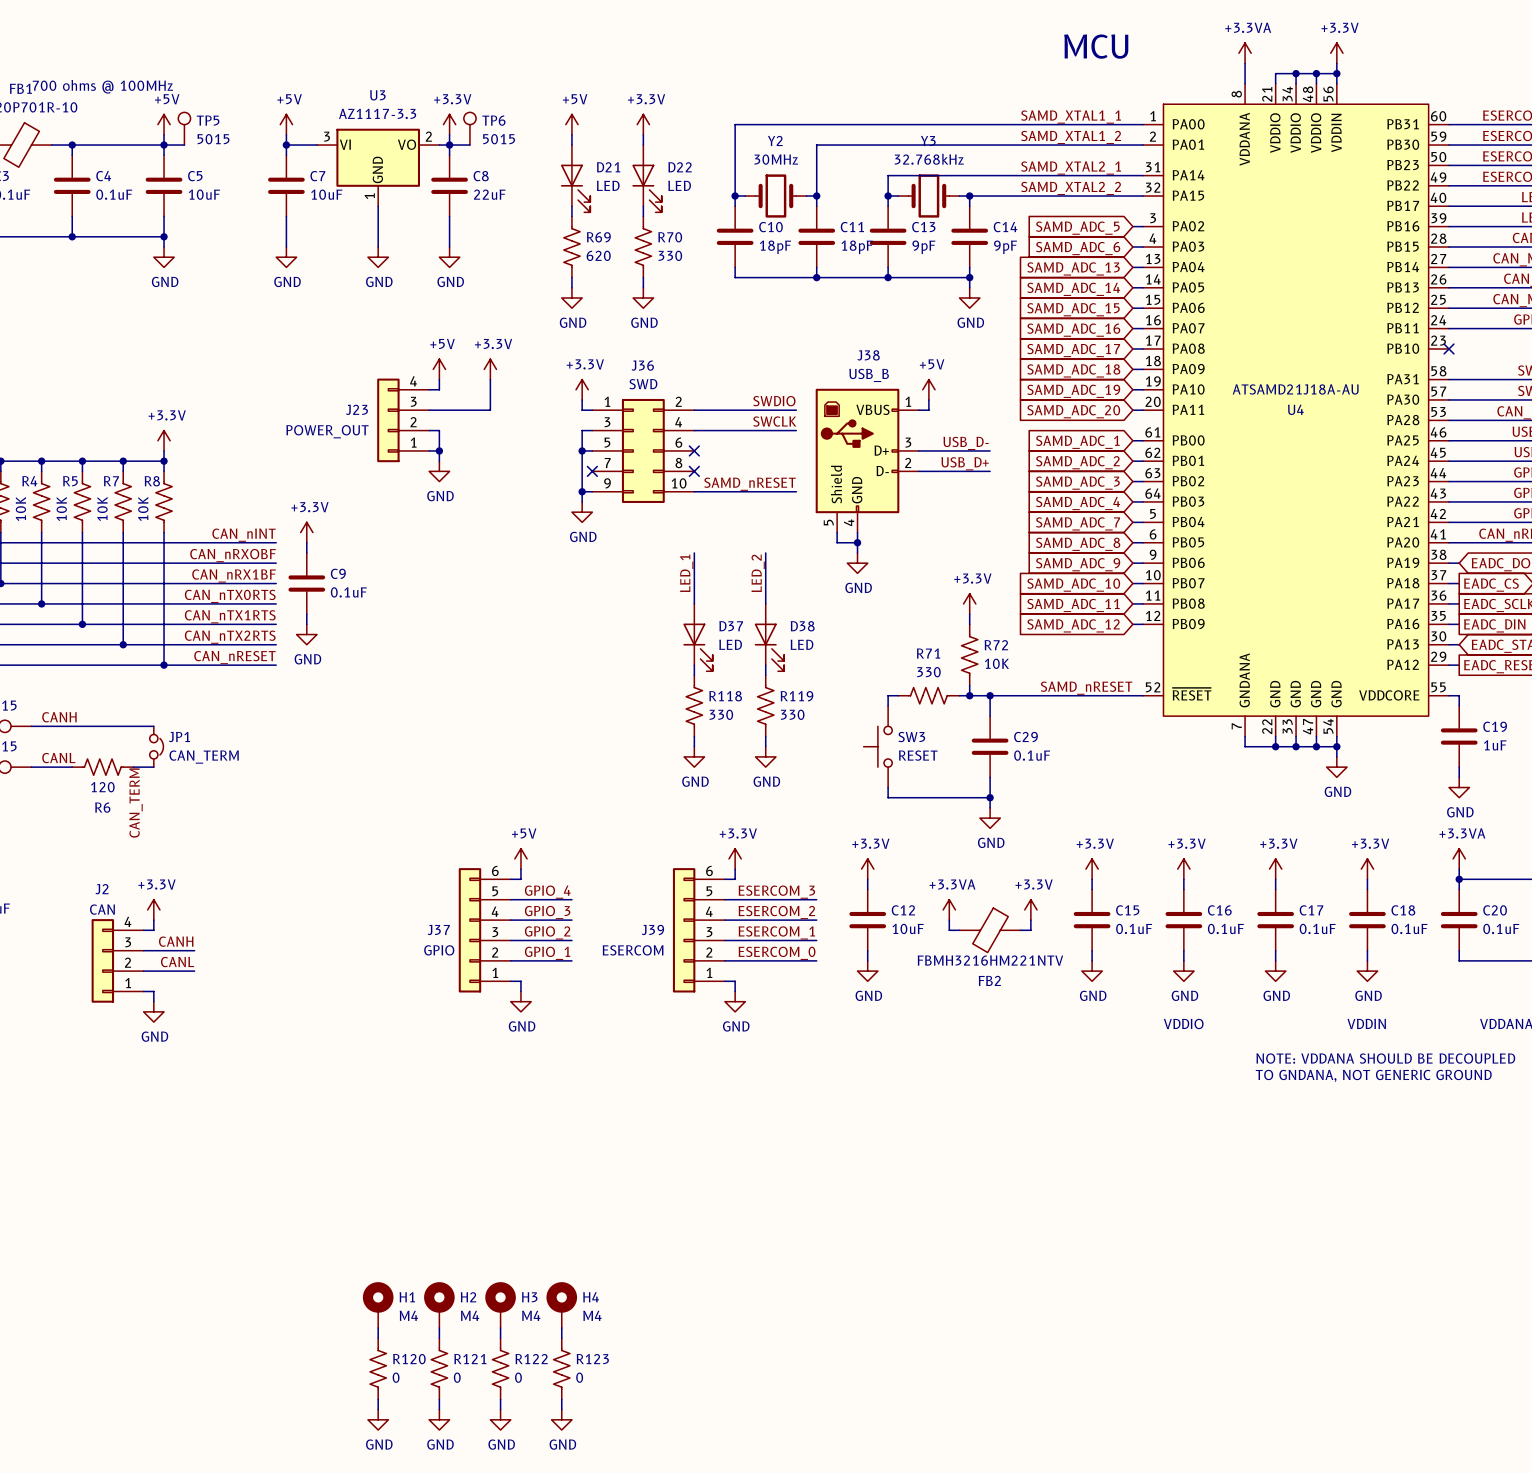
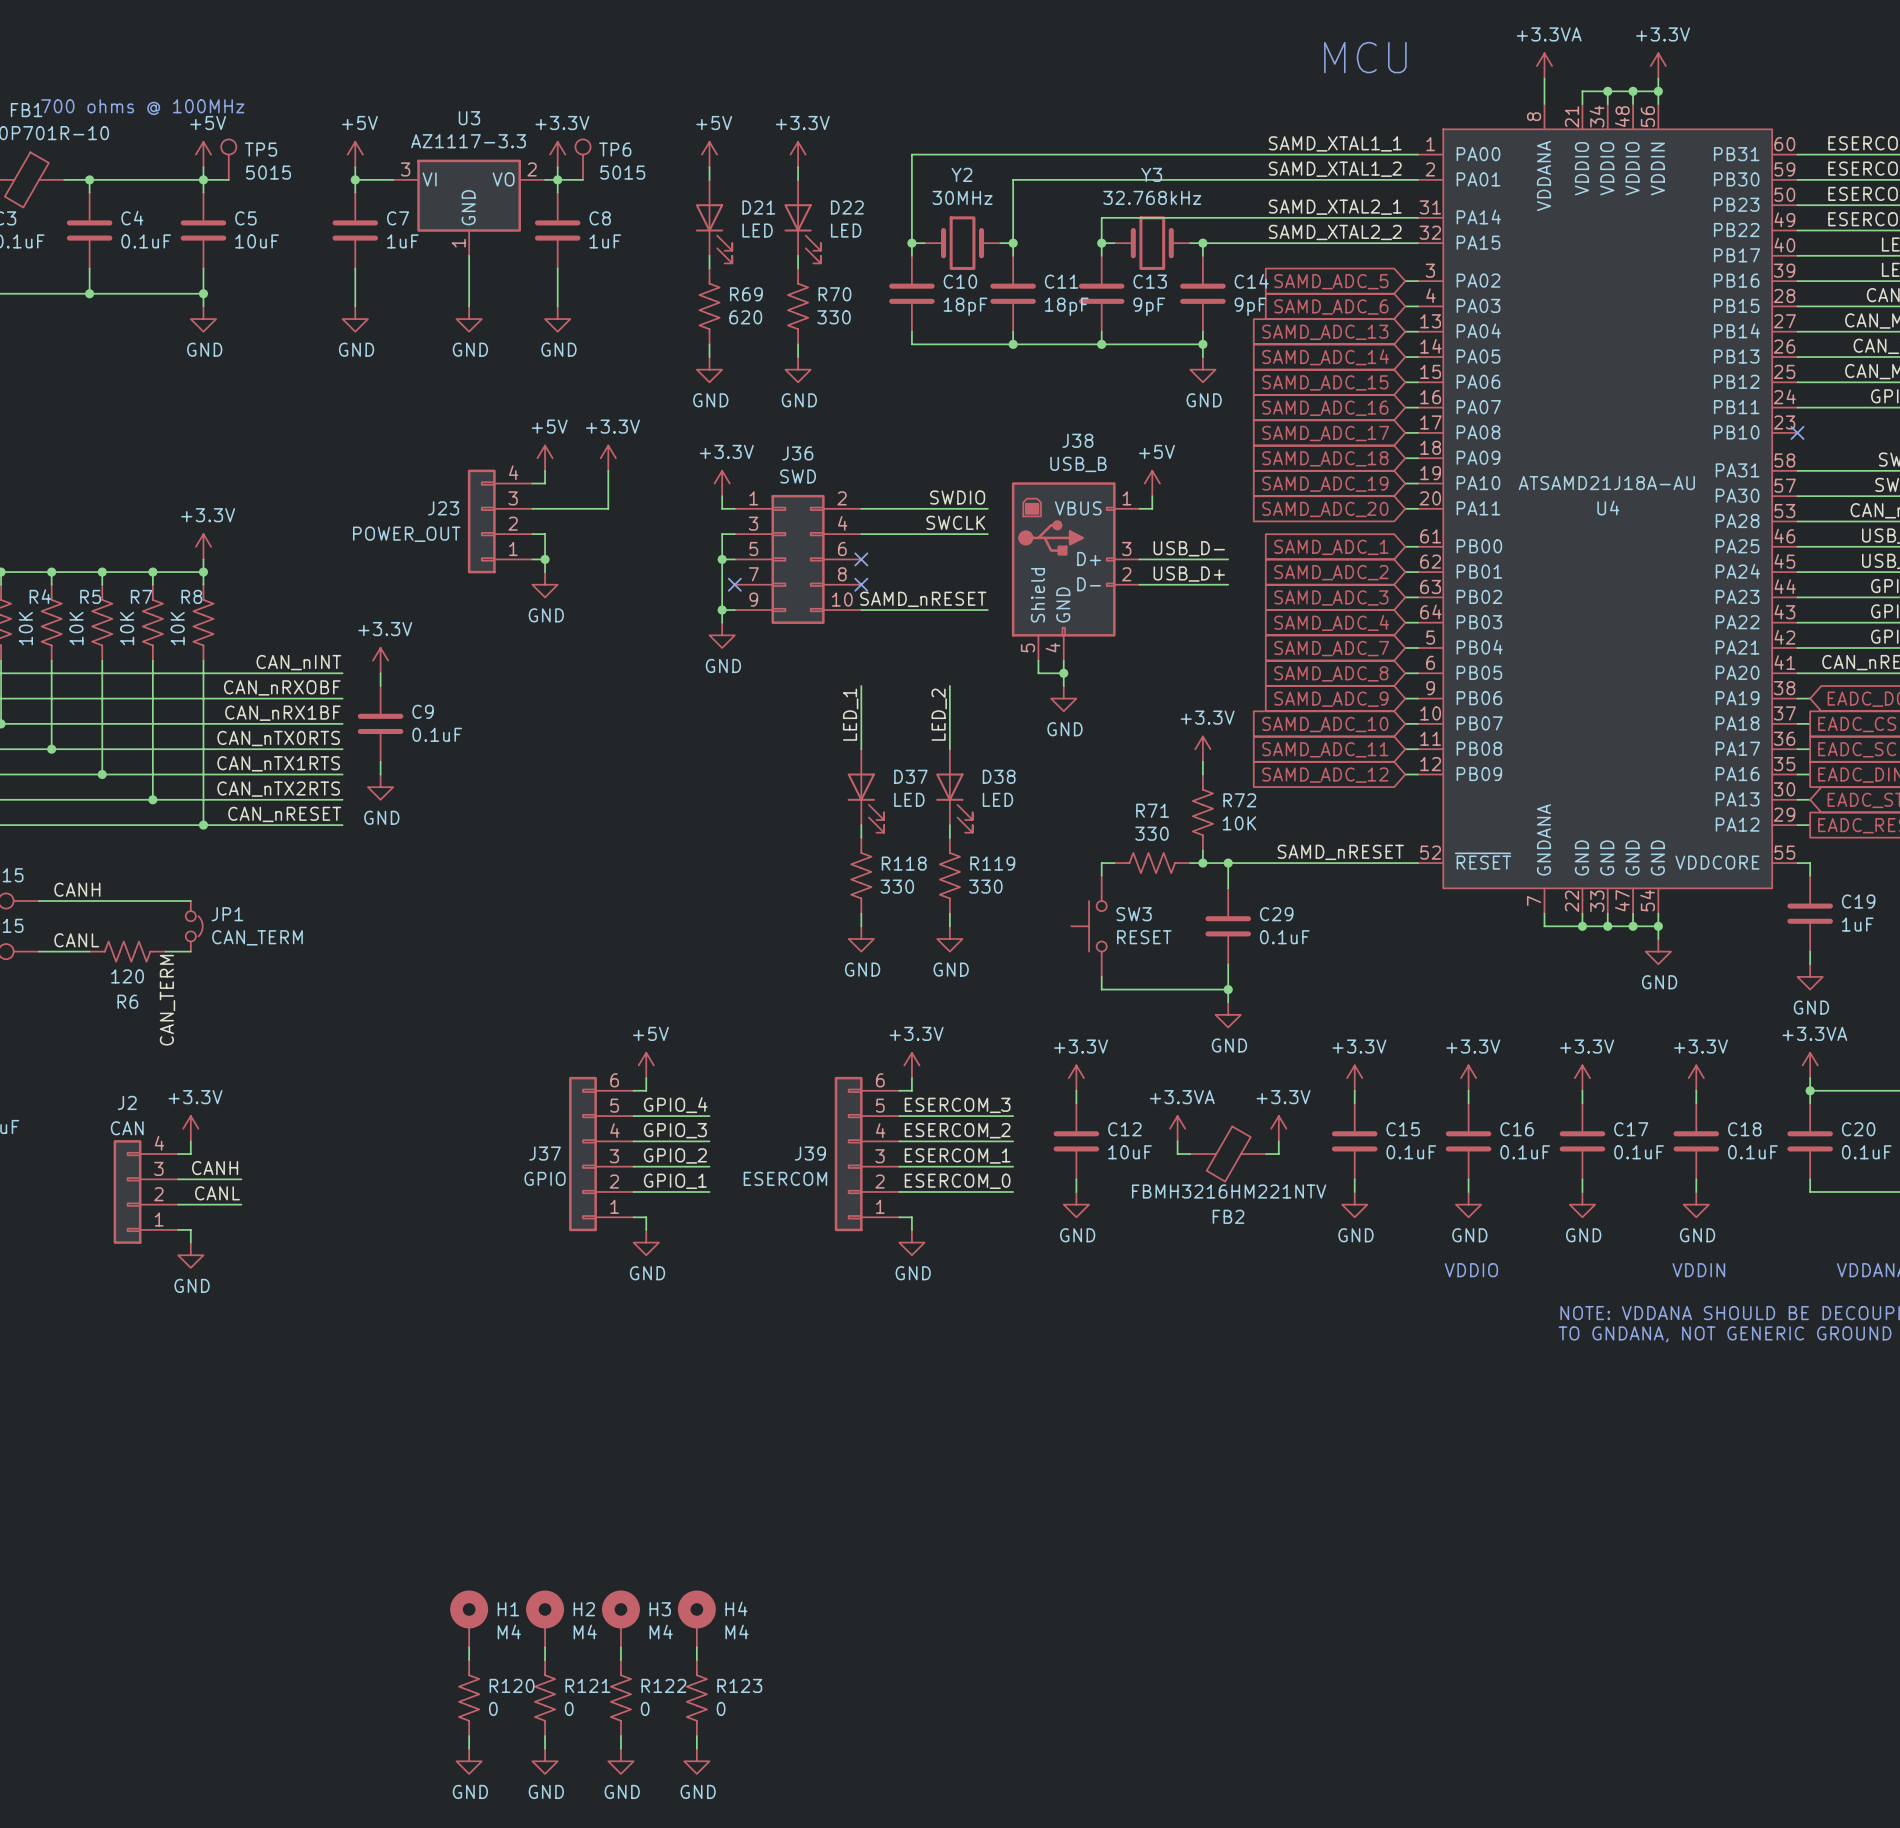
C7 value: 10uF (326, 194) -> 1uF (402, 241)
C8 value: 22uF (489, 194) -> 1uF (605, 241)

